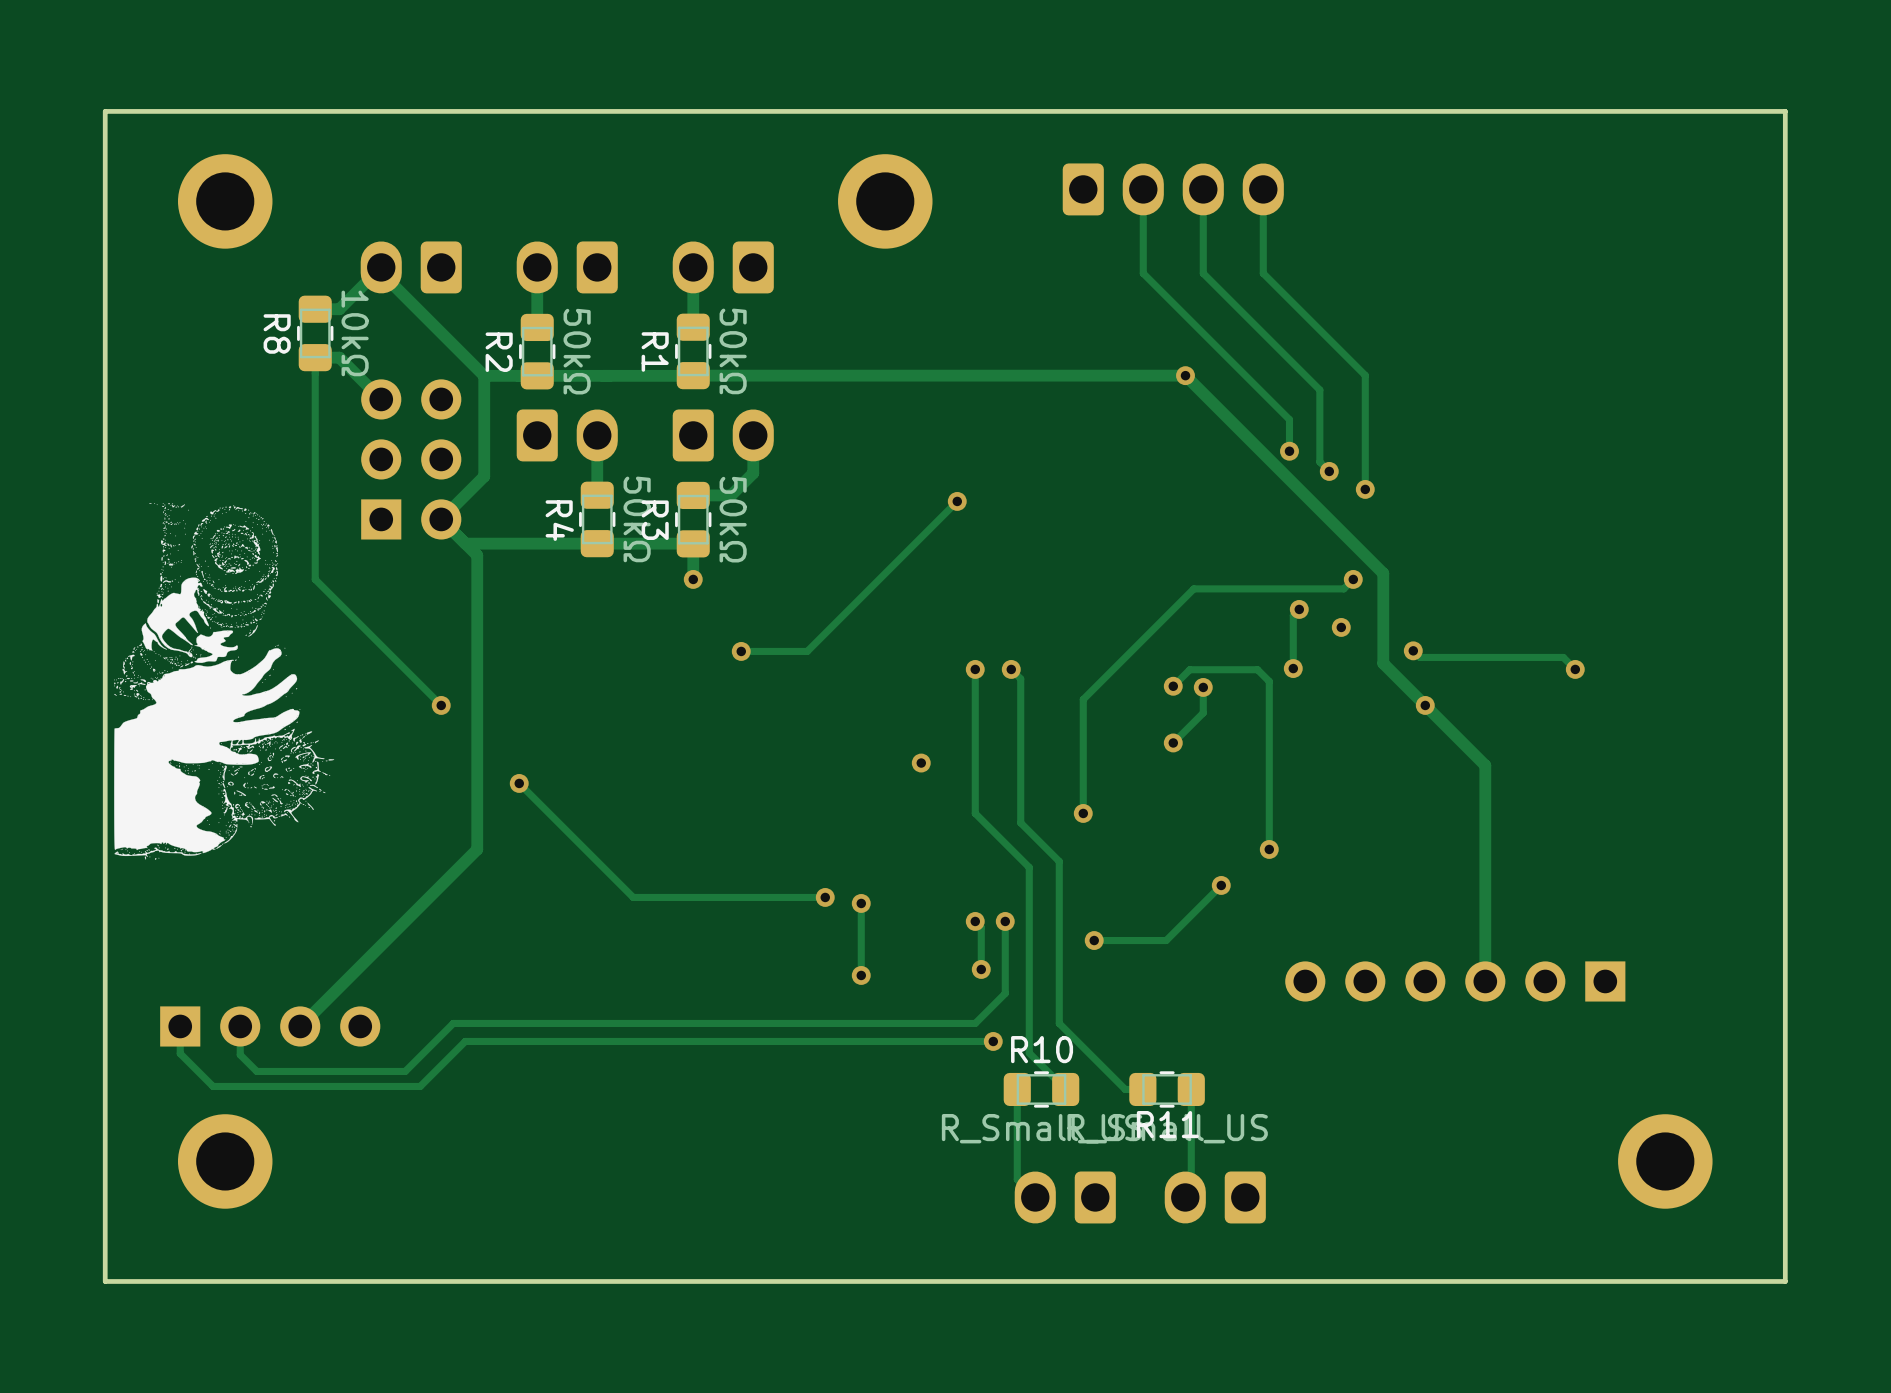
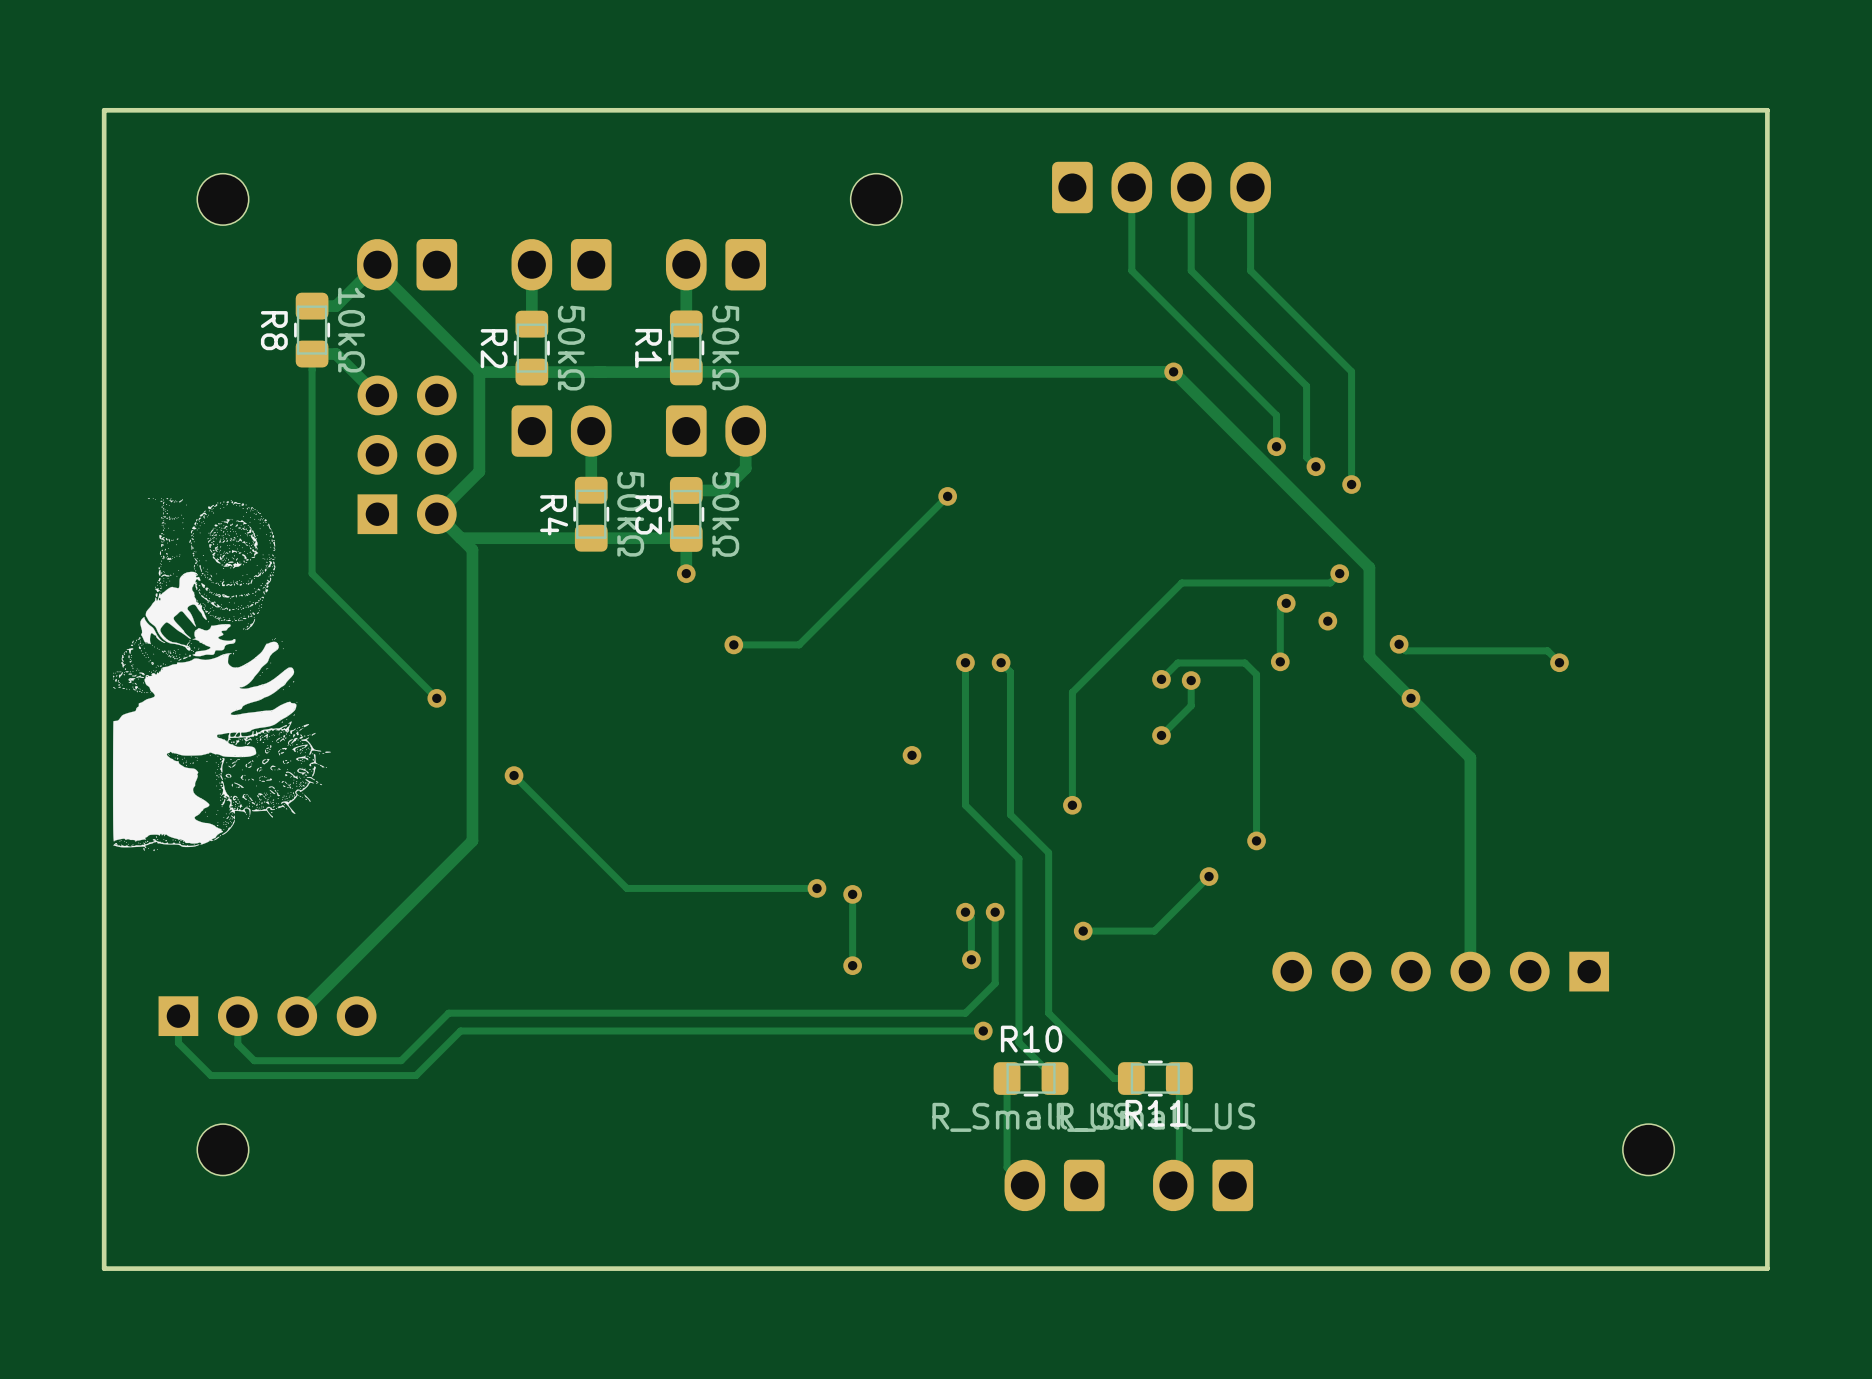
part footprint: [177, 154, 273, 249] -> [197, 173, 249, 226]
part footprint: [838, 154, 933, 249] -> [850, 173, 903, 226]
part footprint: [177, 1114, 273, 1209] -> [197, 1124, 249, 1176]
part footprint: [1618, 1114, 1713, 1209] -> [1622, 1124, 1675, 1176]

